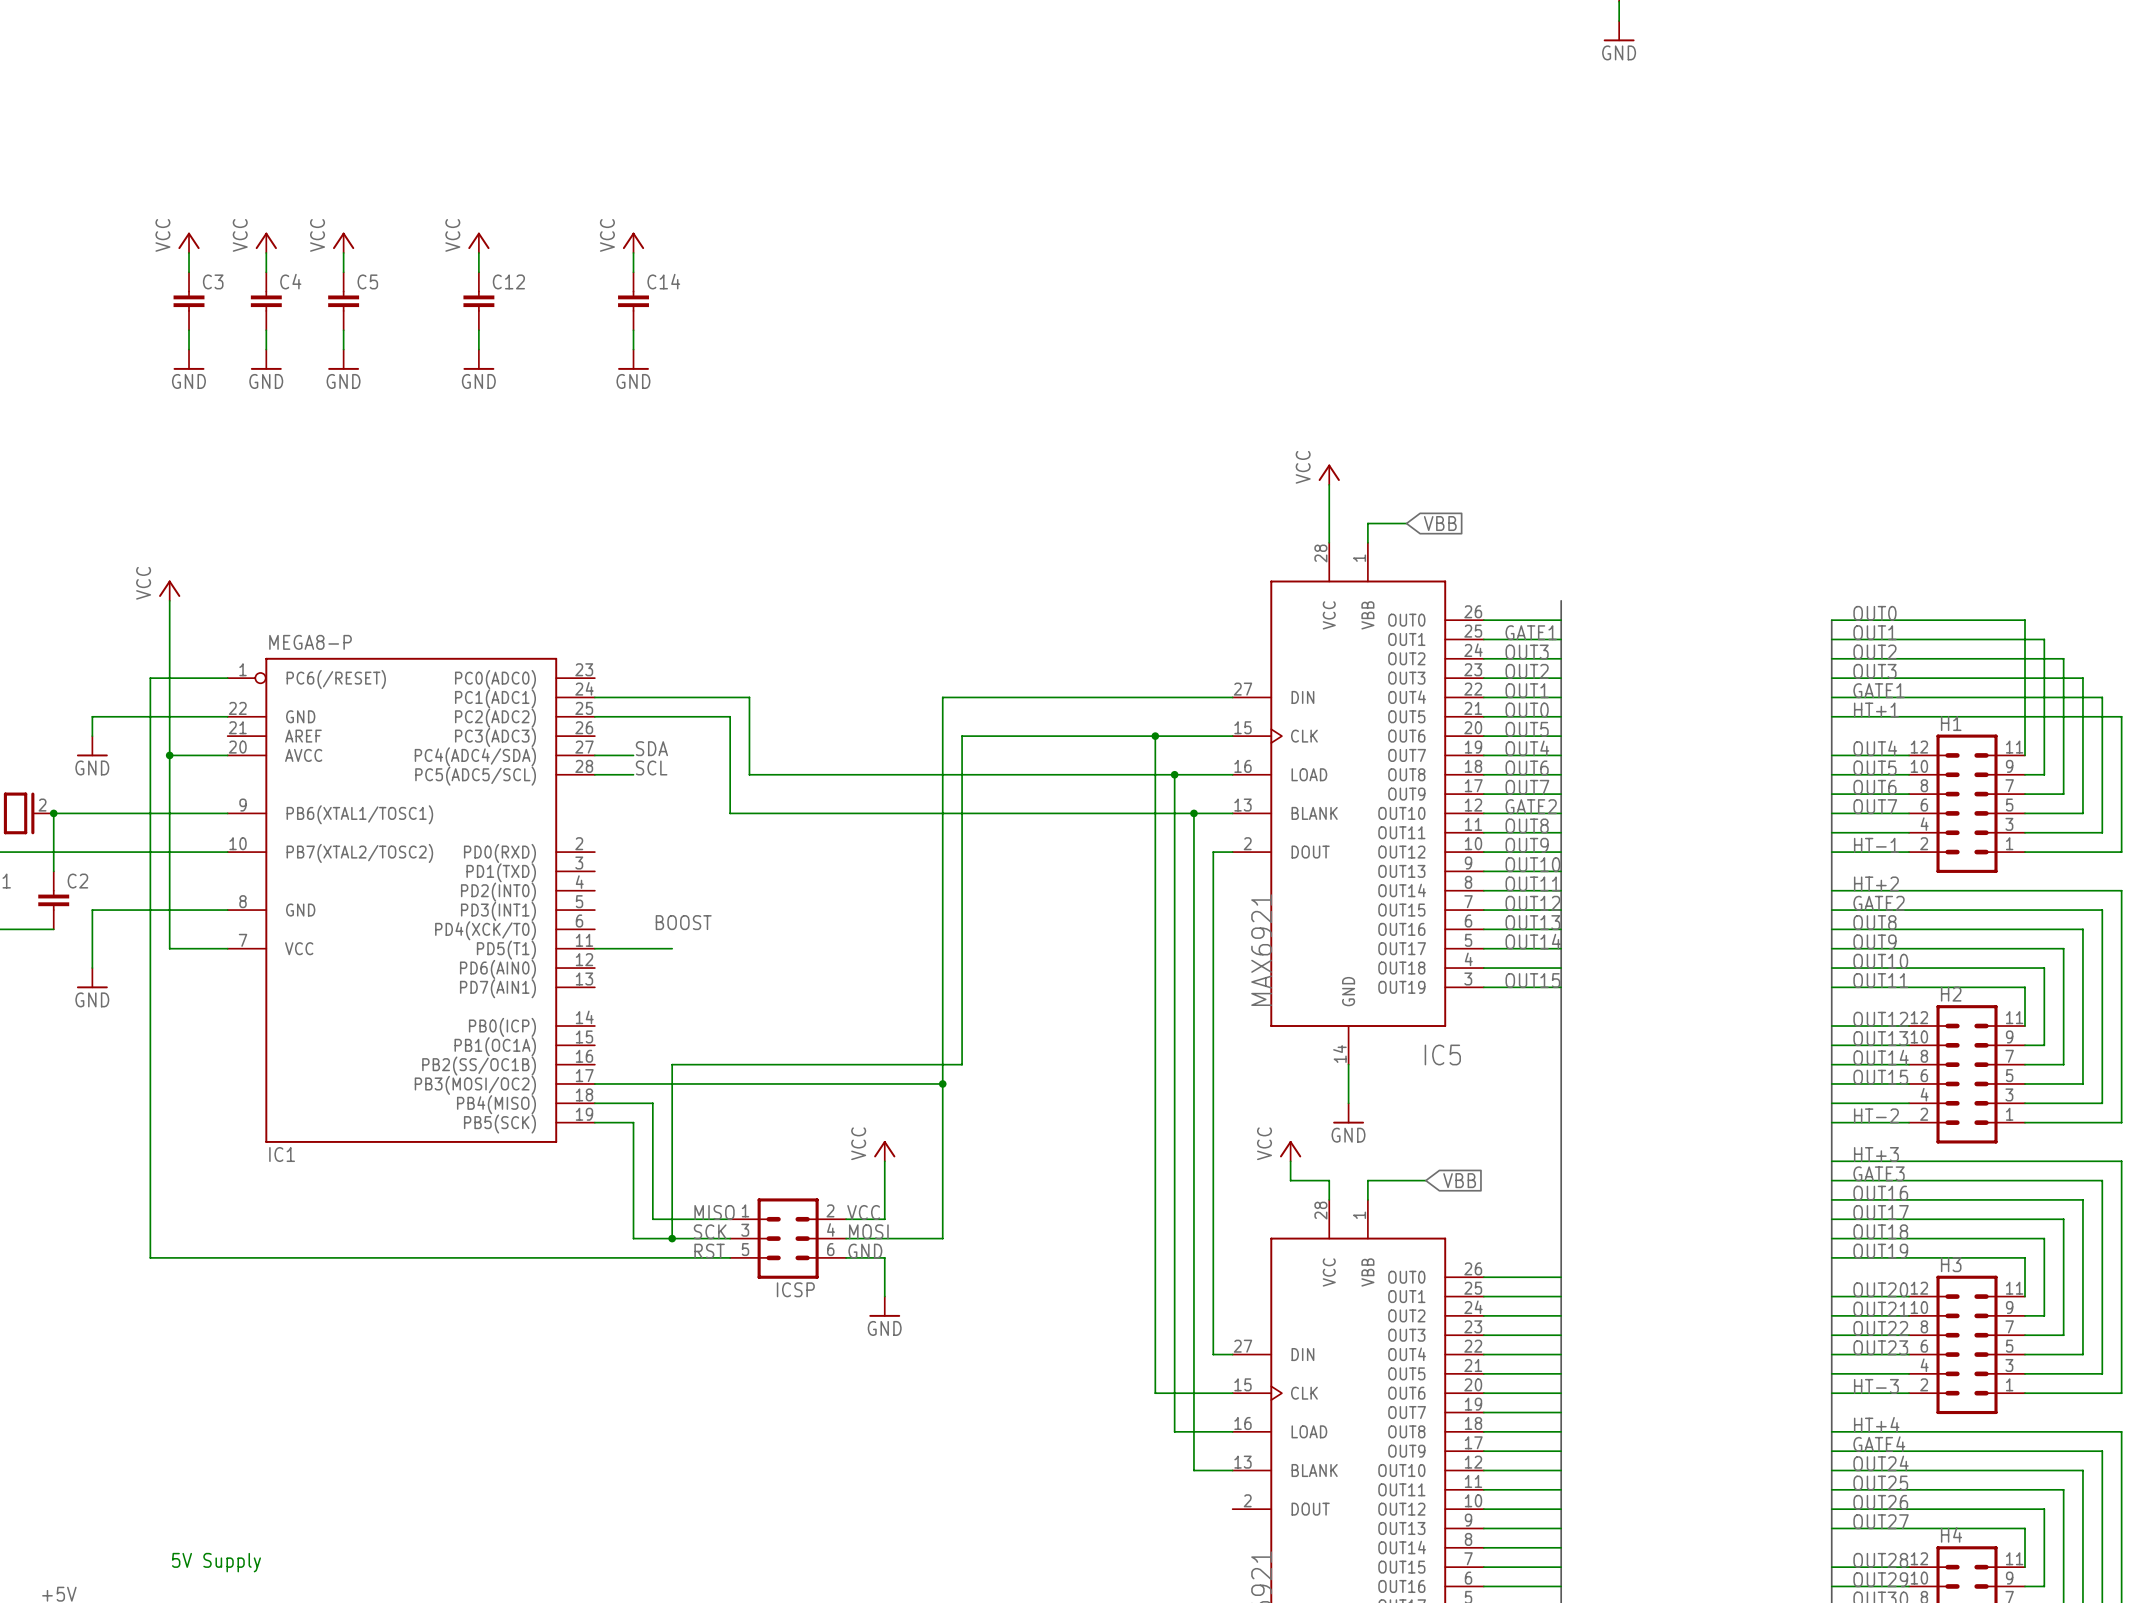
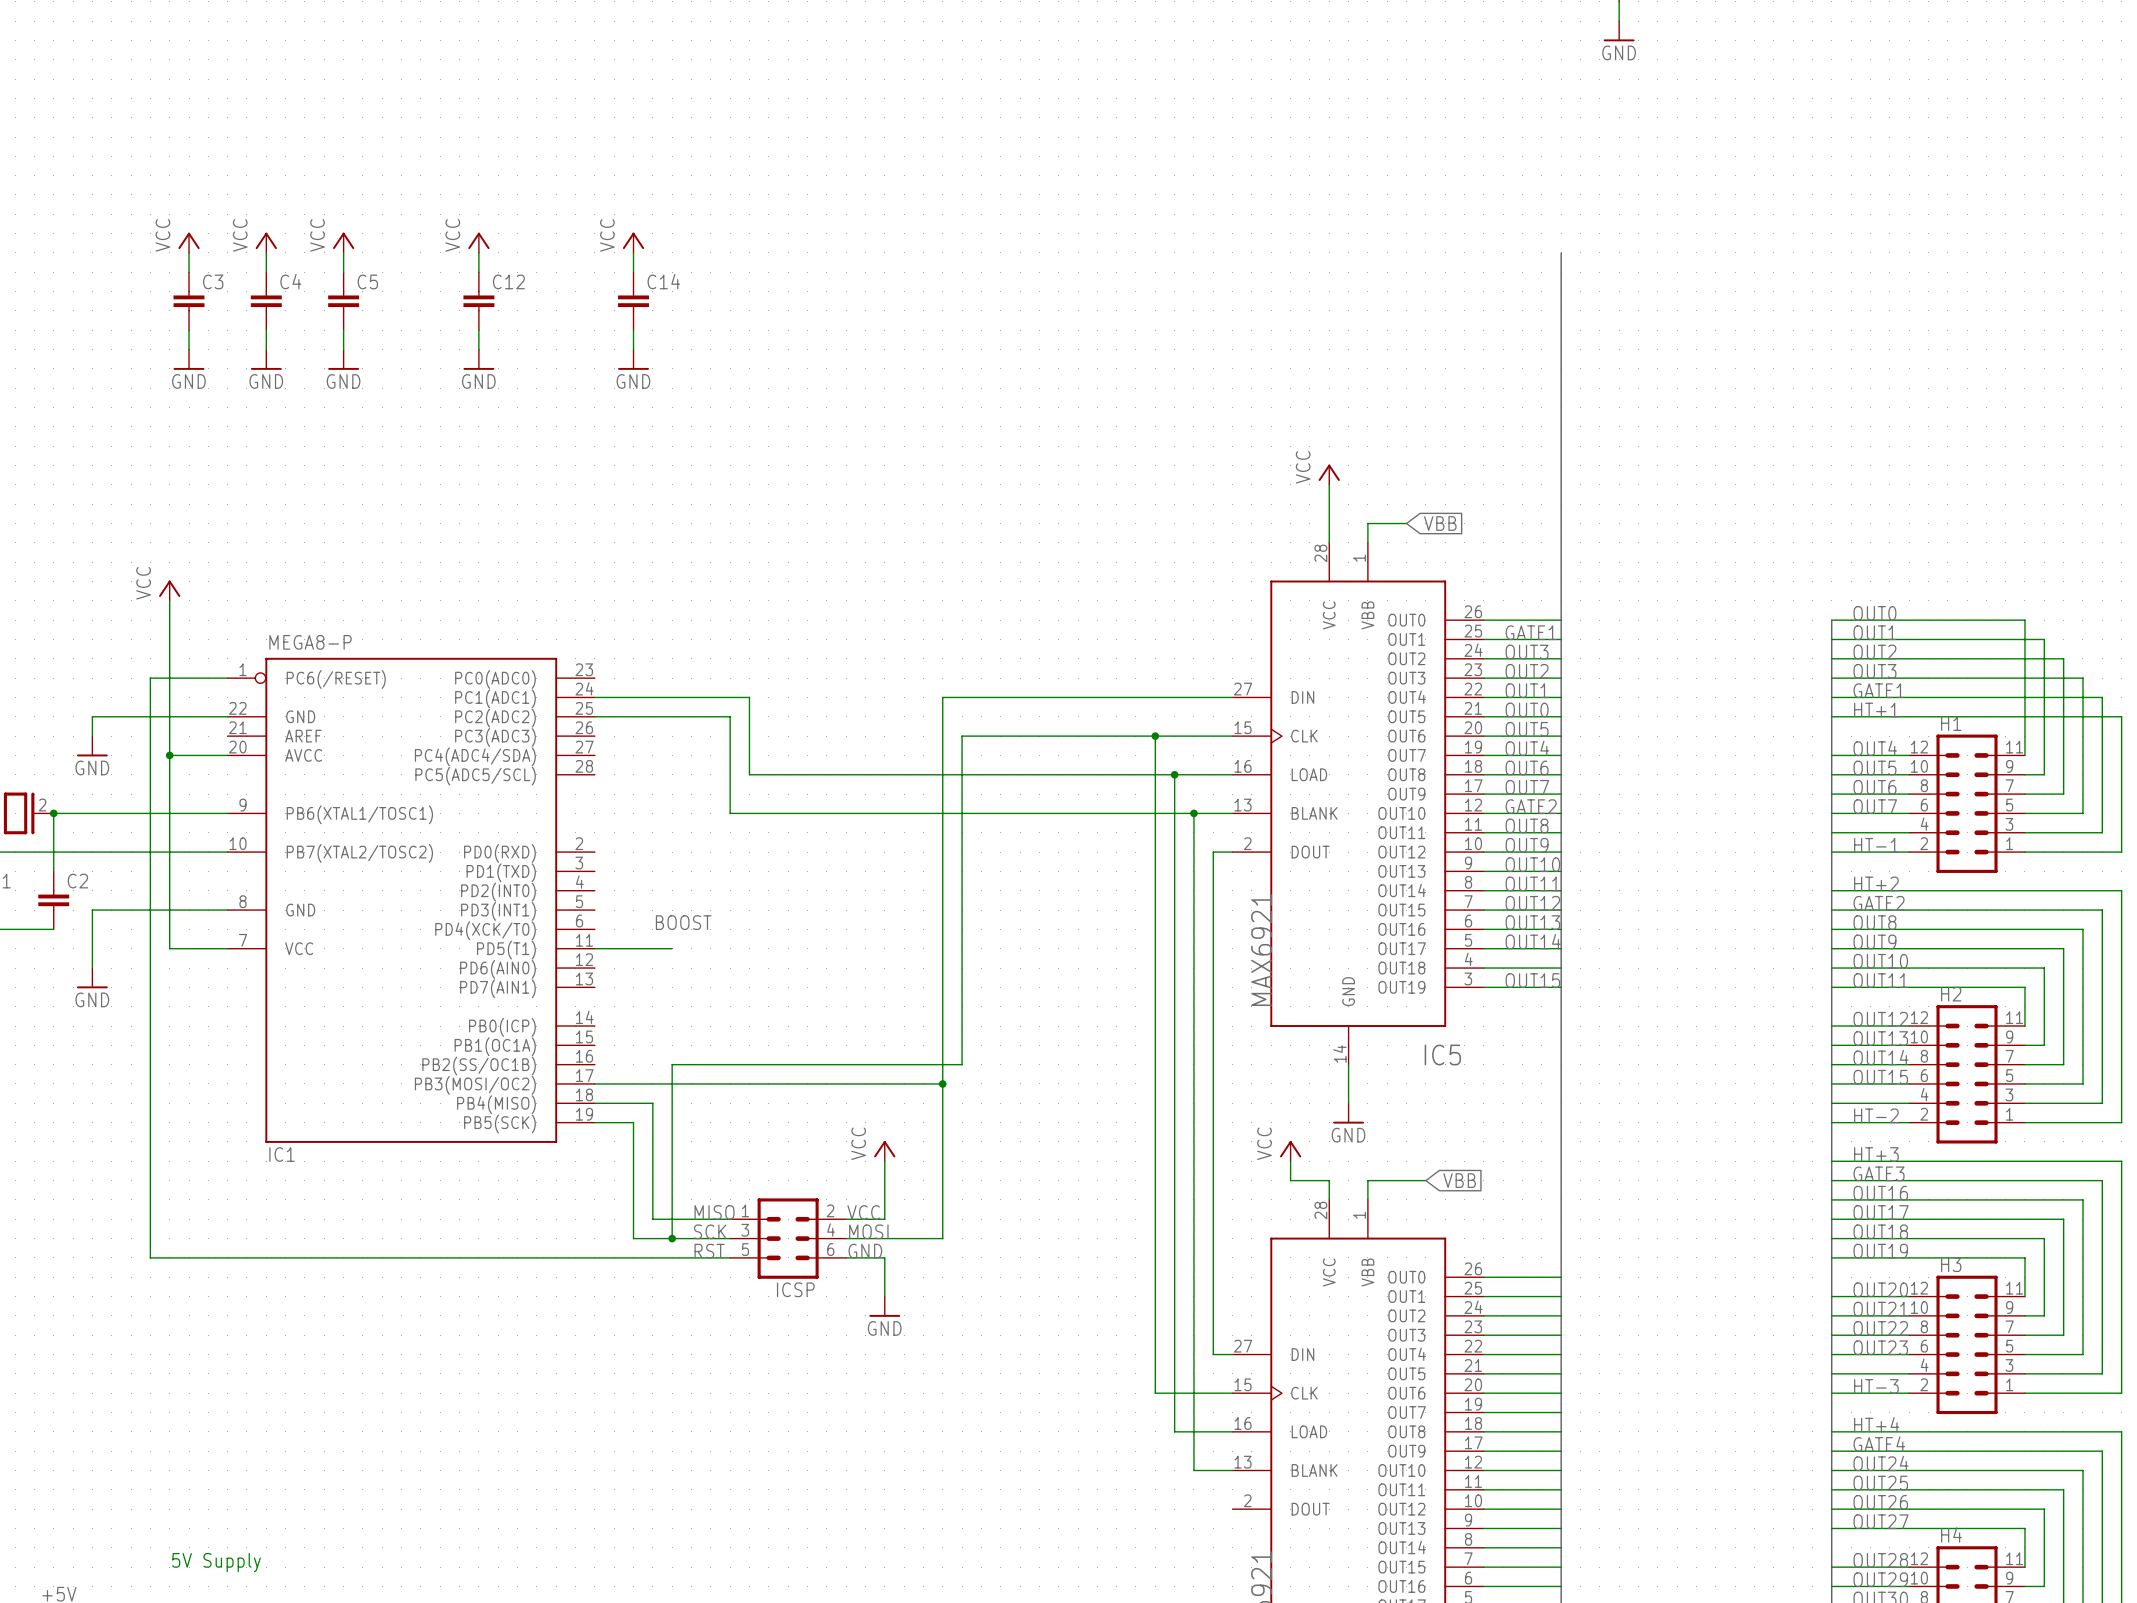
bus: none -> (1561, 252) (1561, 600)
label: SDA (651, 748) -> none
wire: (594, 755) (633, 755) -> none
label: SCL (651, 768) -> none
wire: (594, 774) (633, 774) -> none

